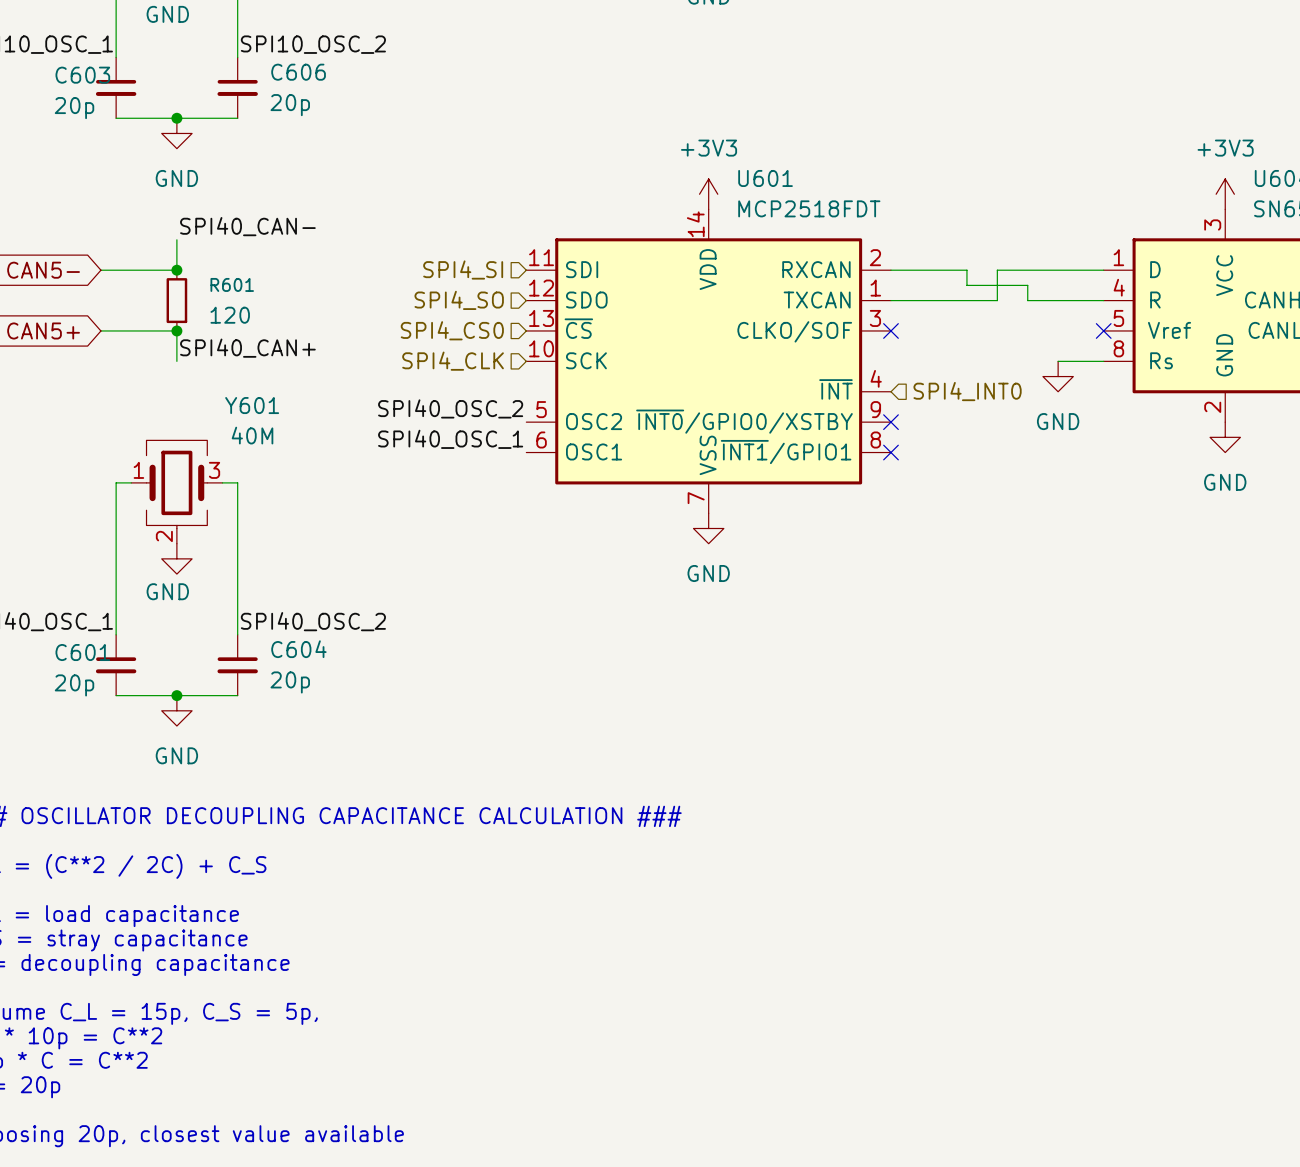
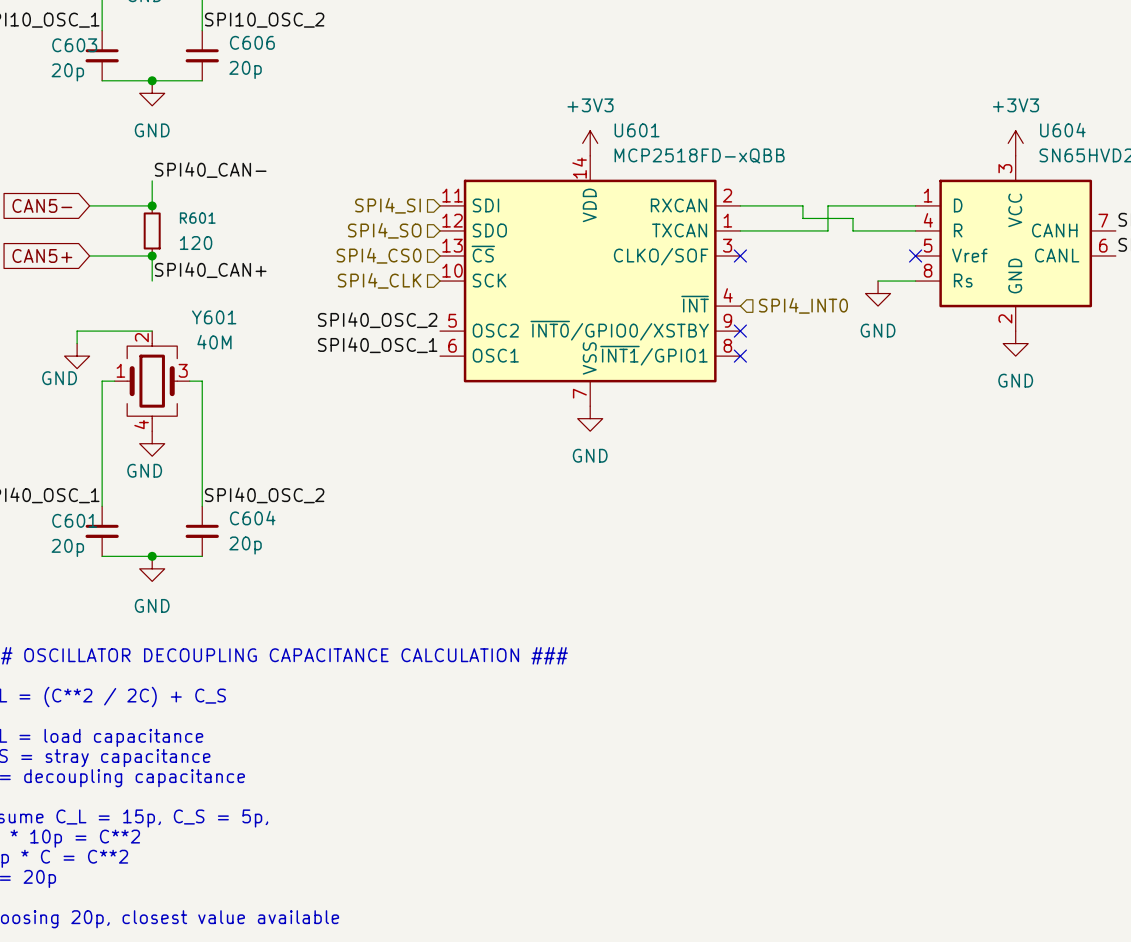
U601 value: MCP2518FDT (809, 208) -> MCP2518FD-xQBB (699, 156)
wire: none -> (152, 331) (77, 331) (77, 343)
Y601 symbol: [131, 440, 223, 544] -> [114, 331, 190, 432]
power symbol: none -> GND (77, 356)

